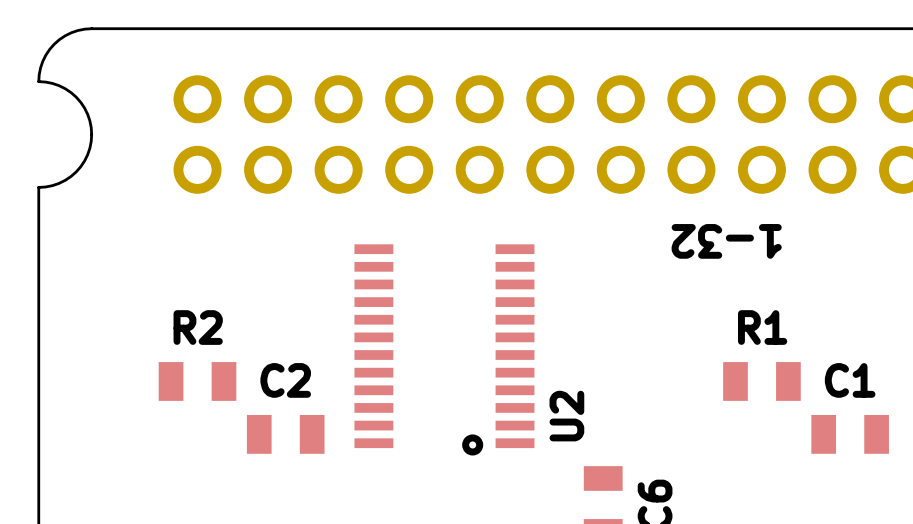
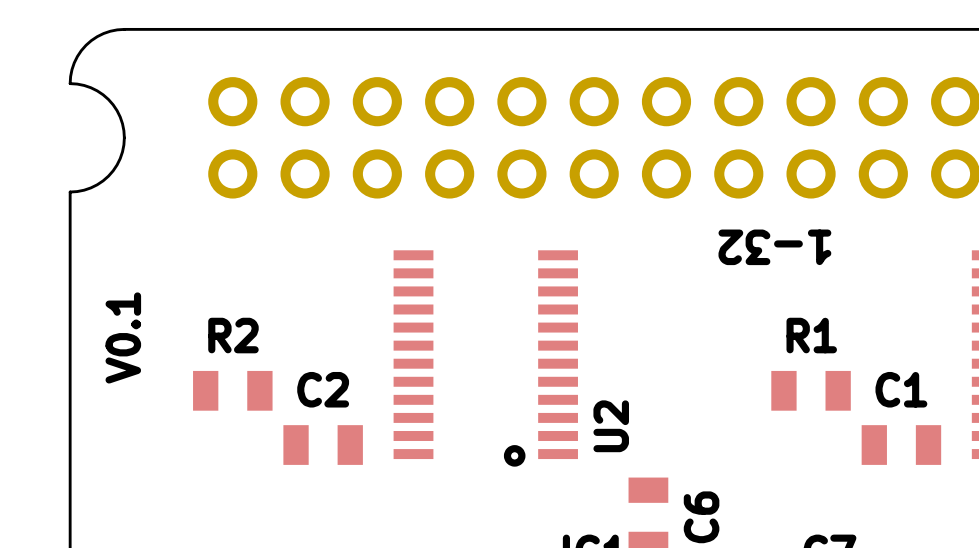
text: none -> V0.1 (123, 337)

